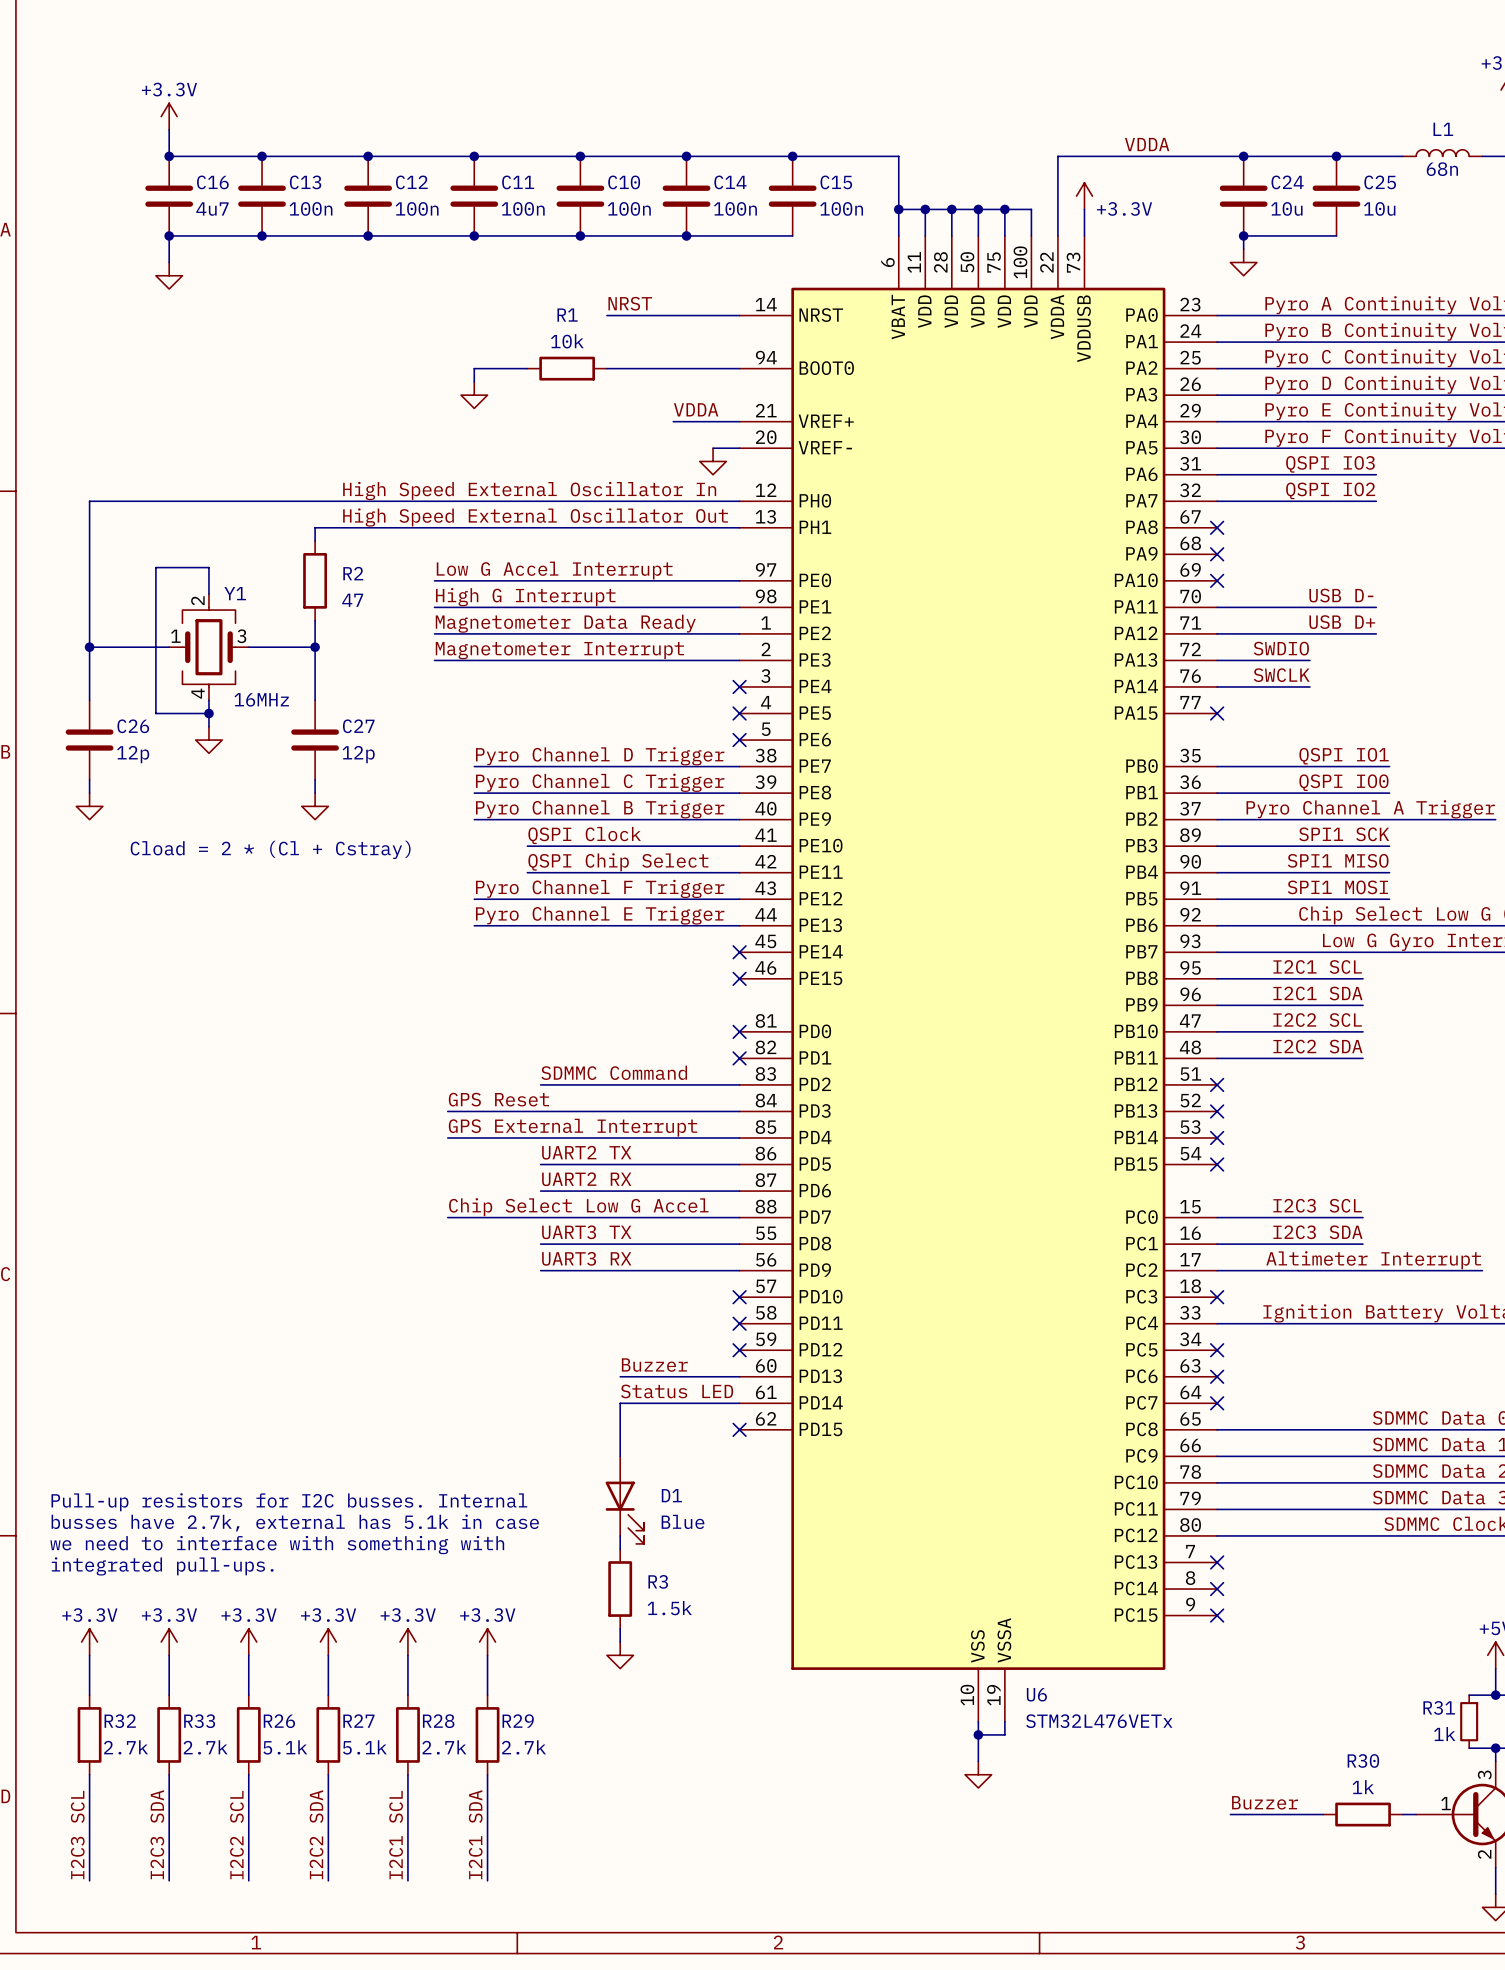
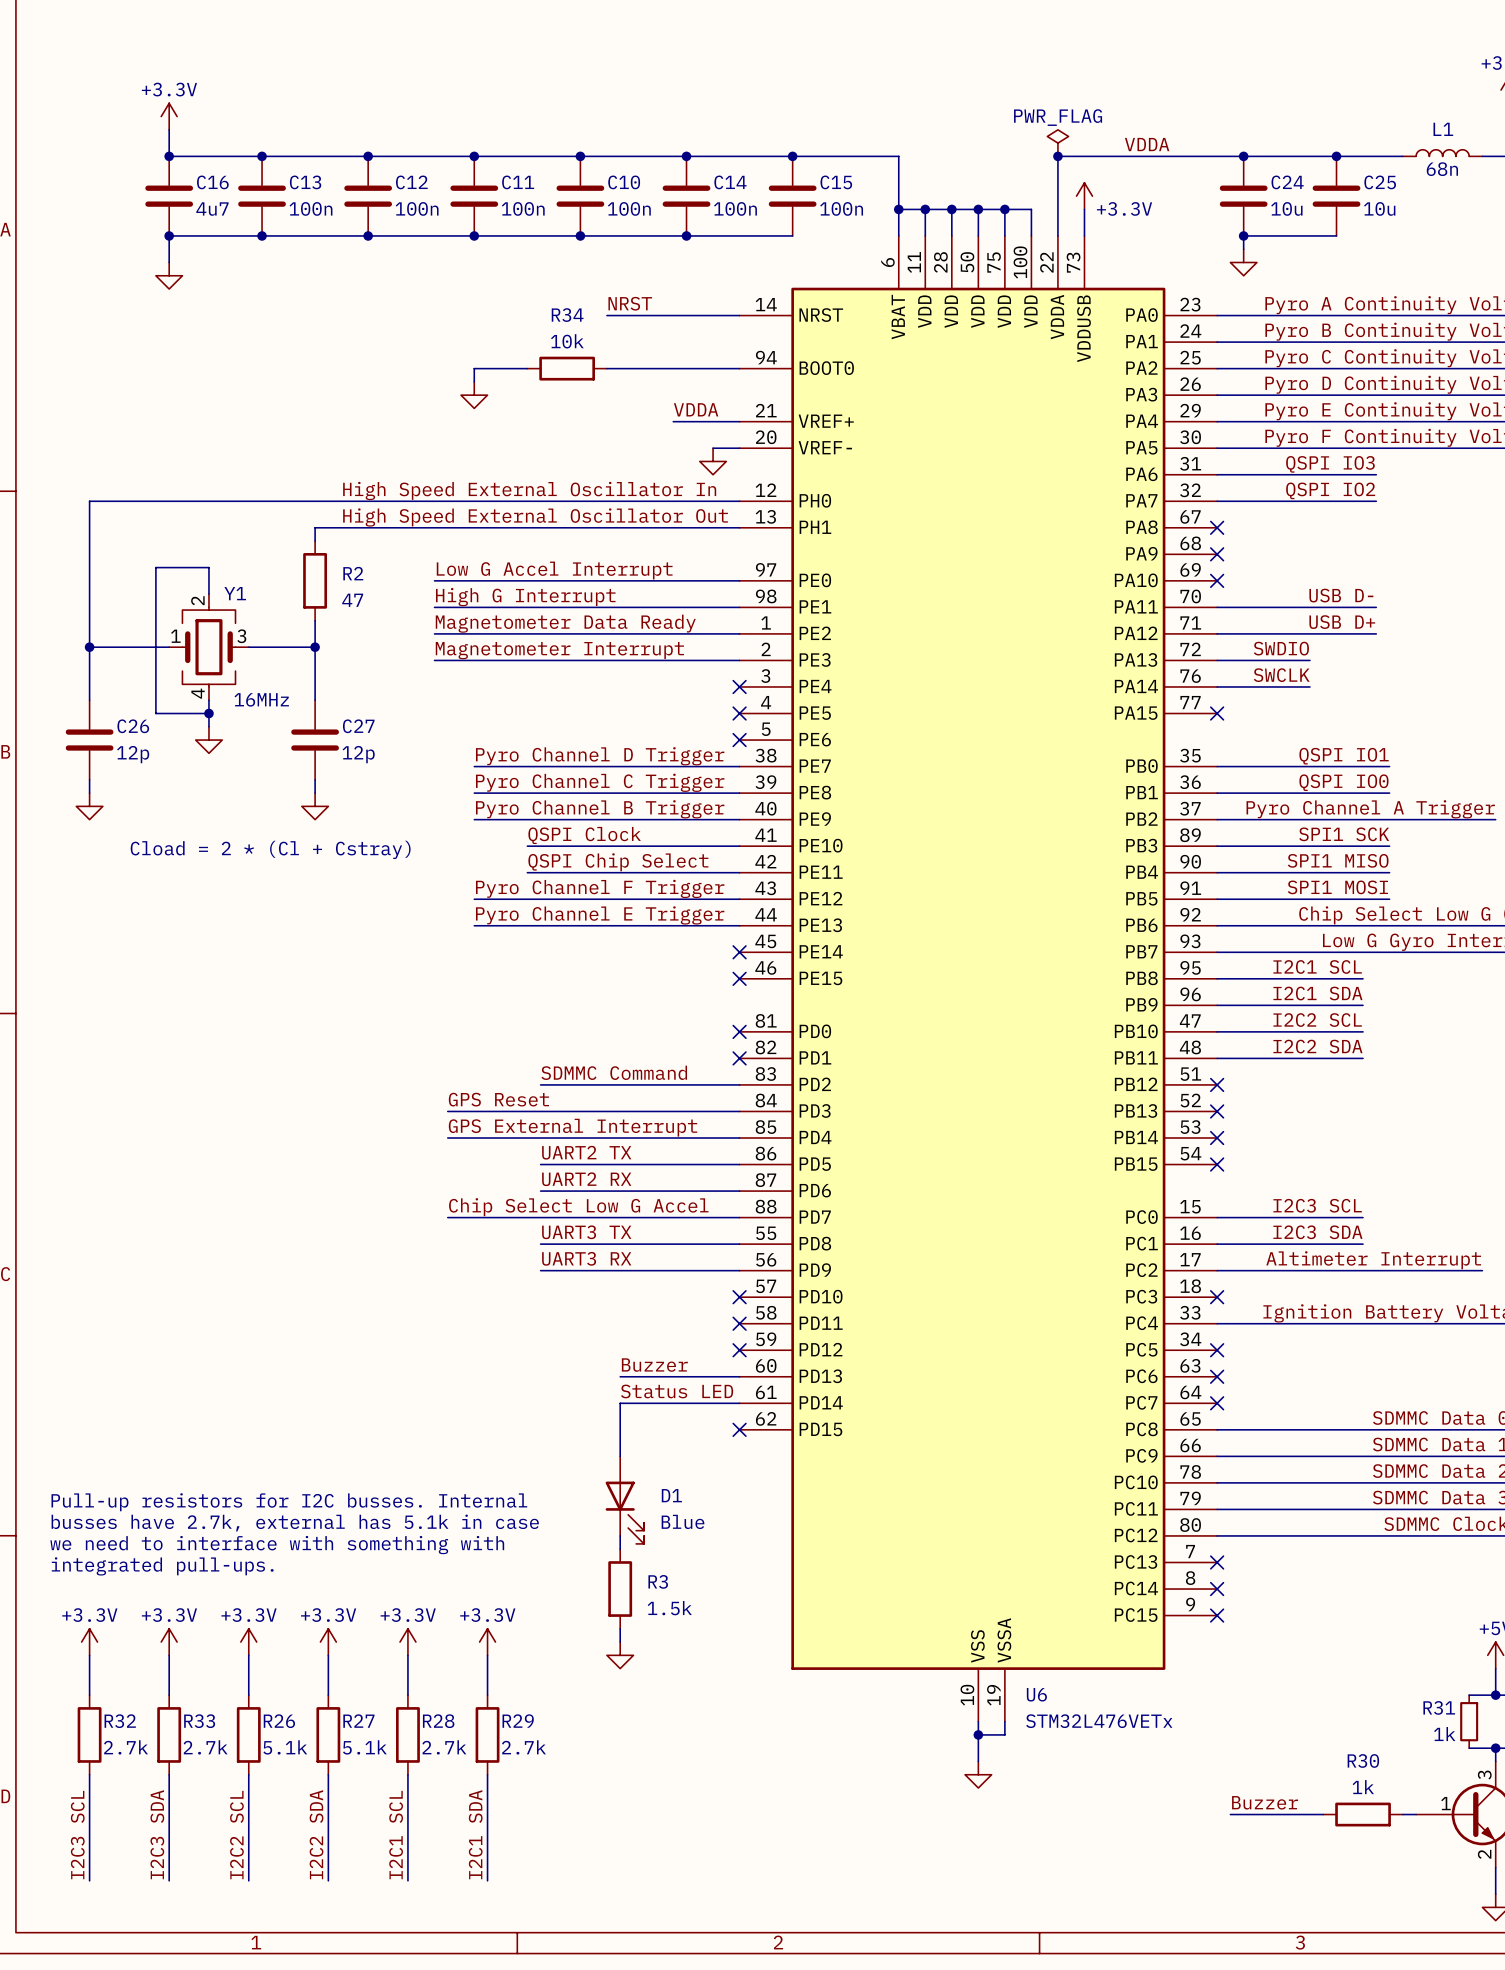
power symbol: none -> PWR_FLAG (1057, 143)
junction: none -> (1057, 156)
R1 name: R1 (567, 315) -> R34 (567, 315)

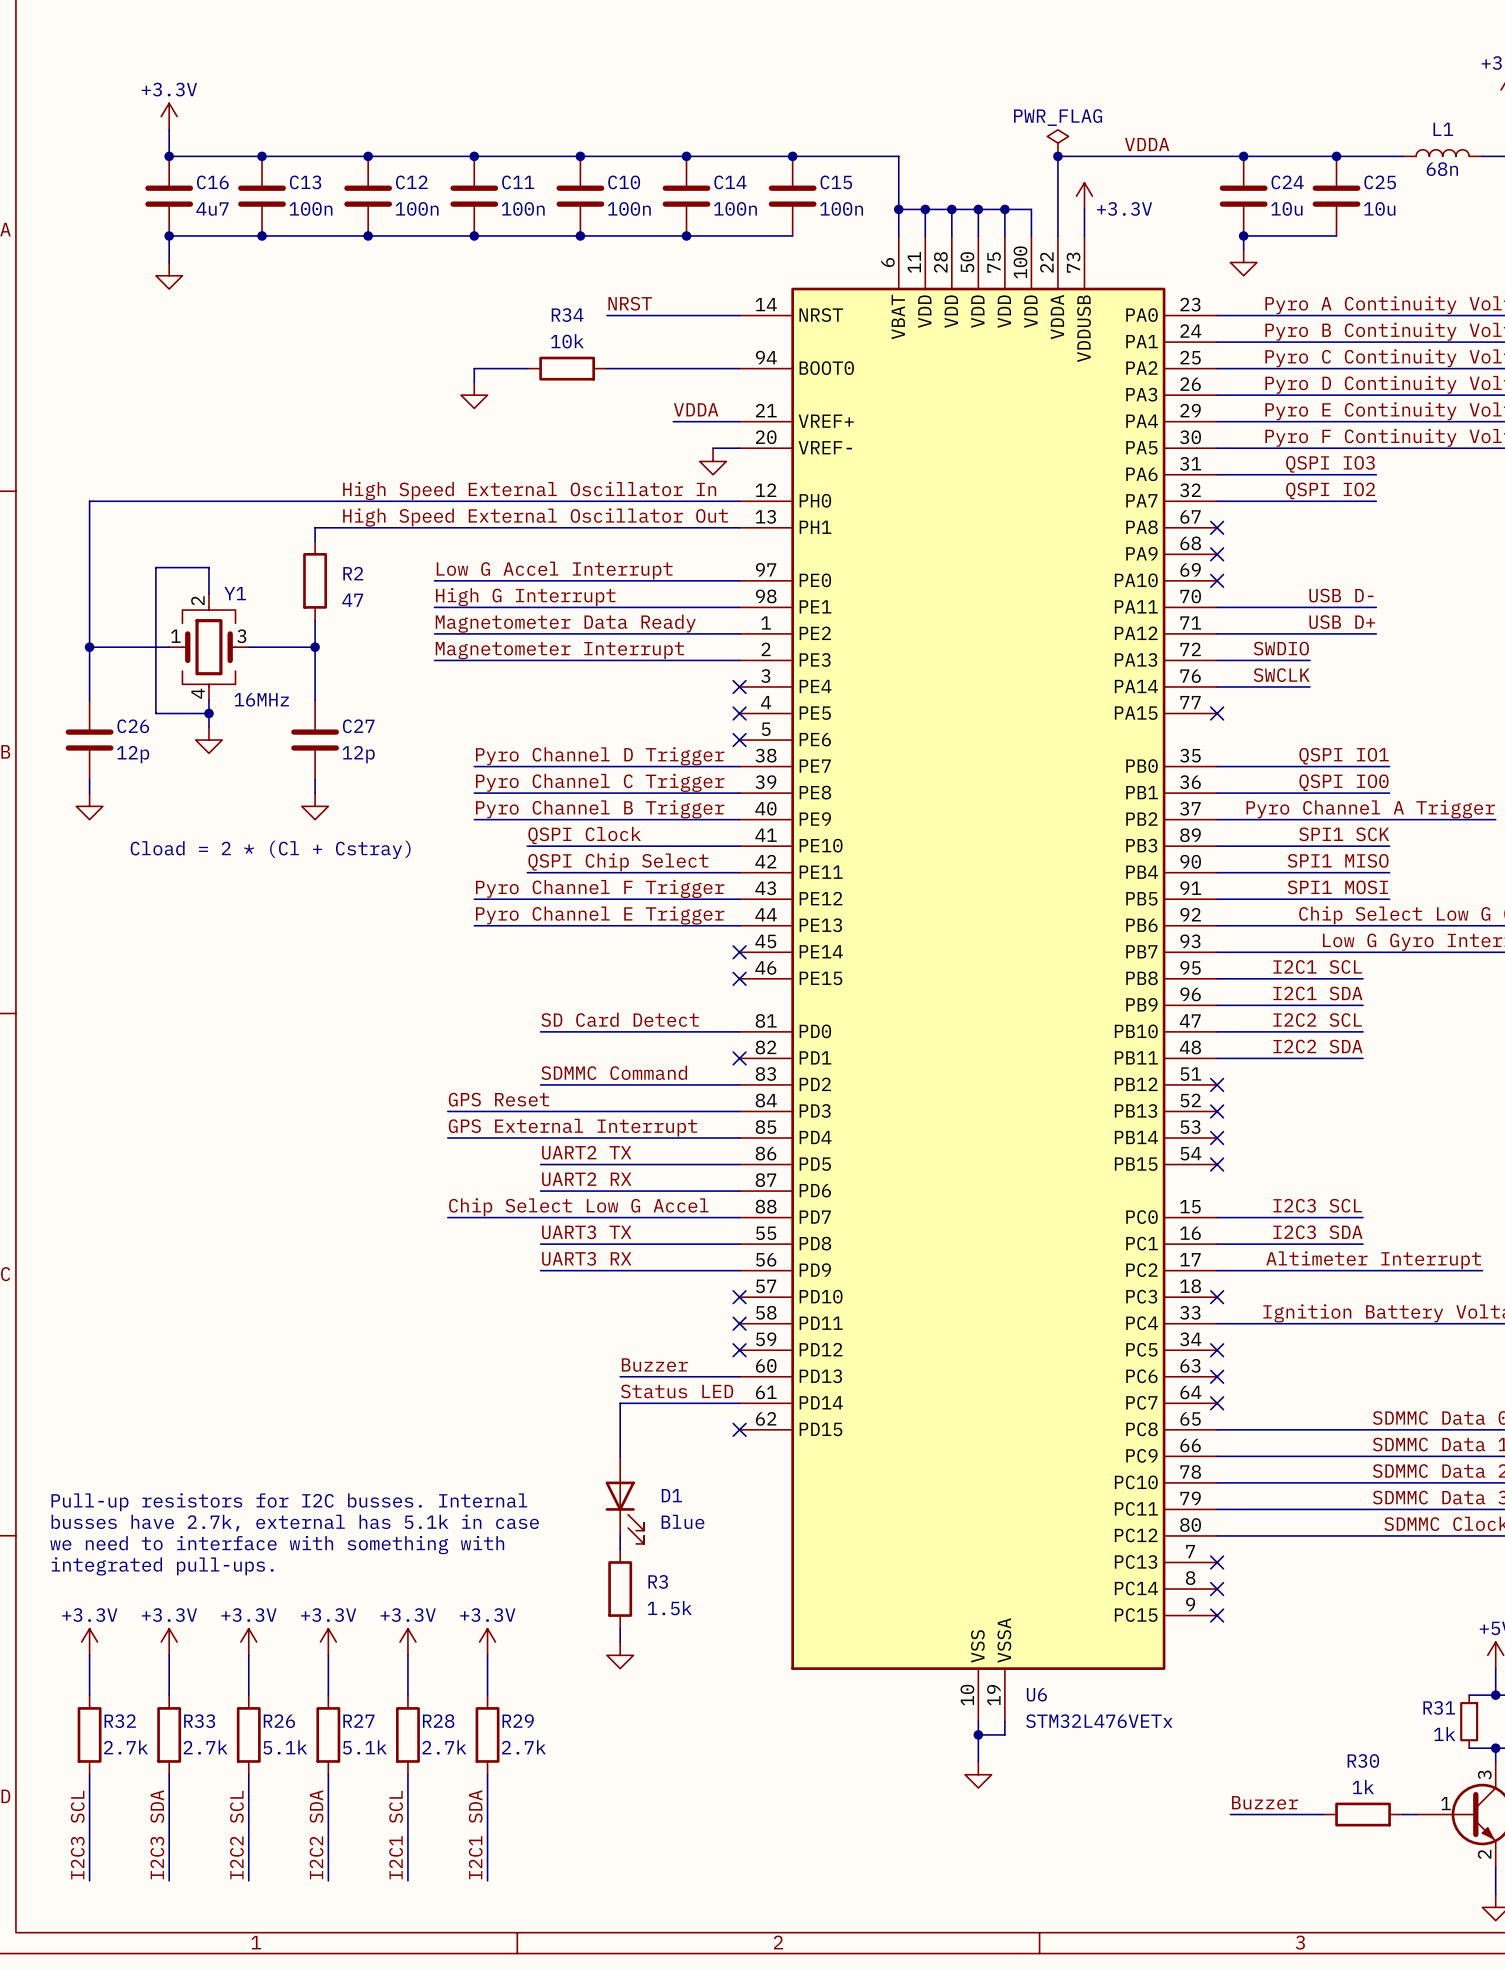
label: none -> SD Card Detect (620, 1019)
wire: none -> (540, 1031) (739, 1031)
no-connect mark: (739, 1031) -> none

